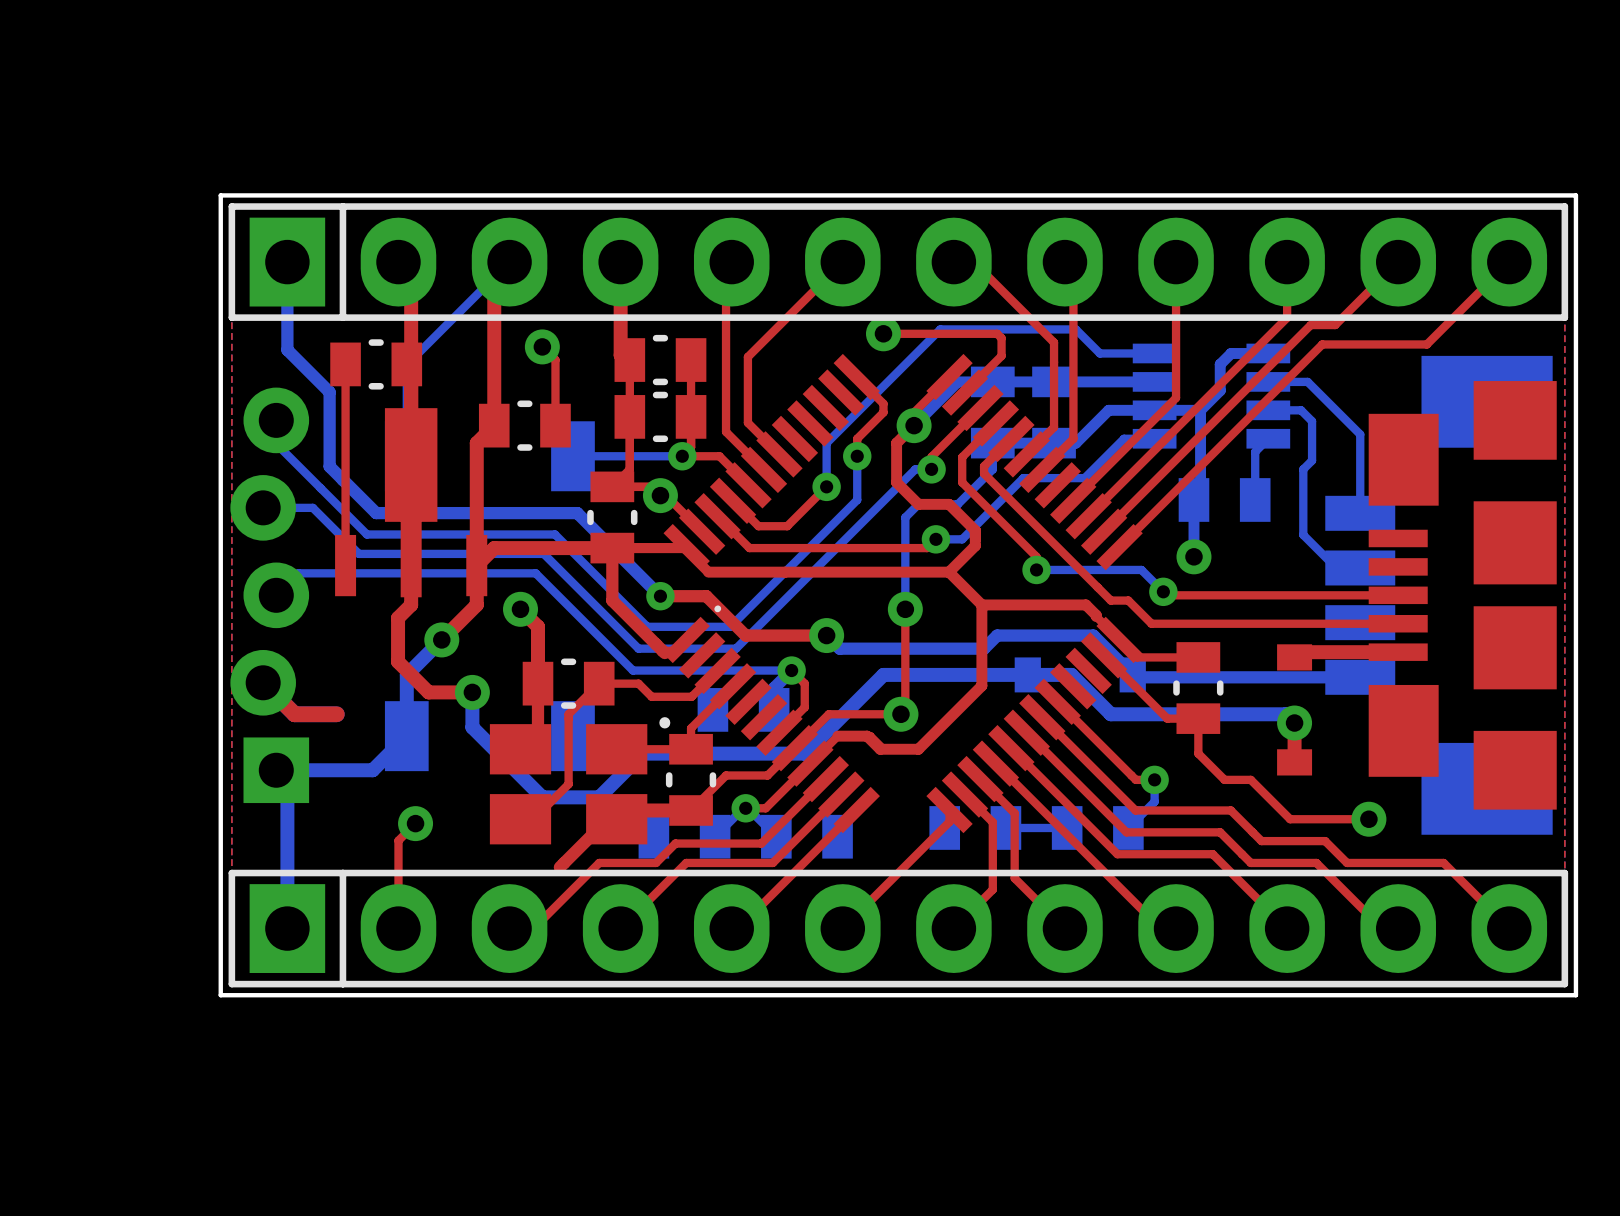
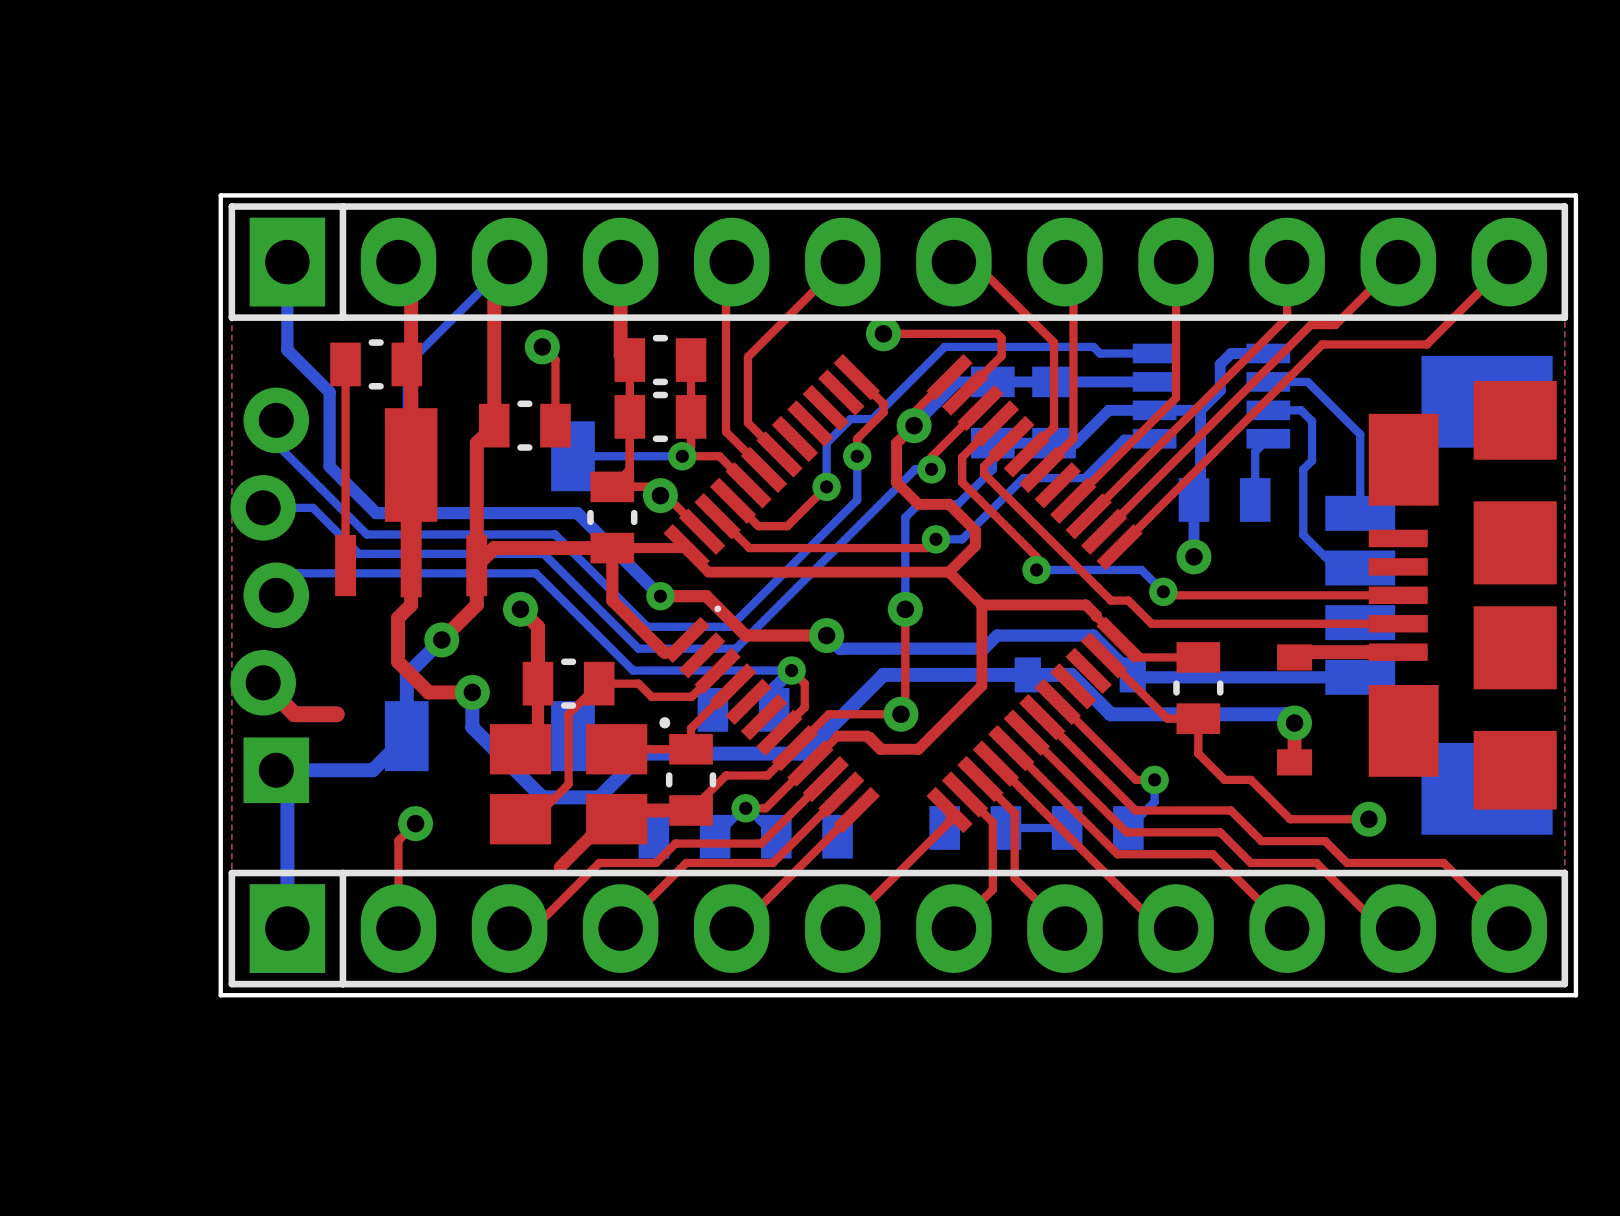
bottom track: (1093, 346) (1075, 329) (940, 329) (850, 419) -> (1093, 346) (944, 346) (872, 419) (850, 419)

